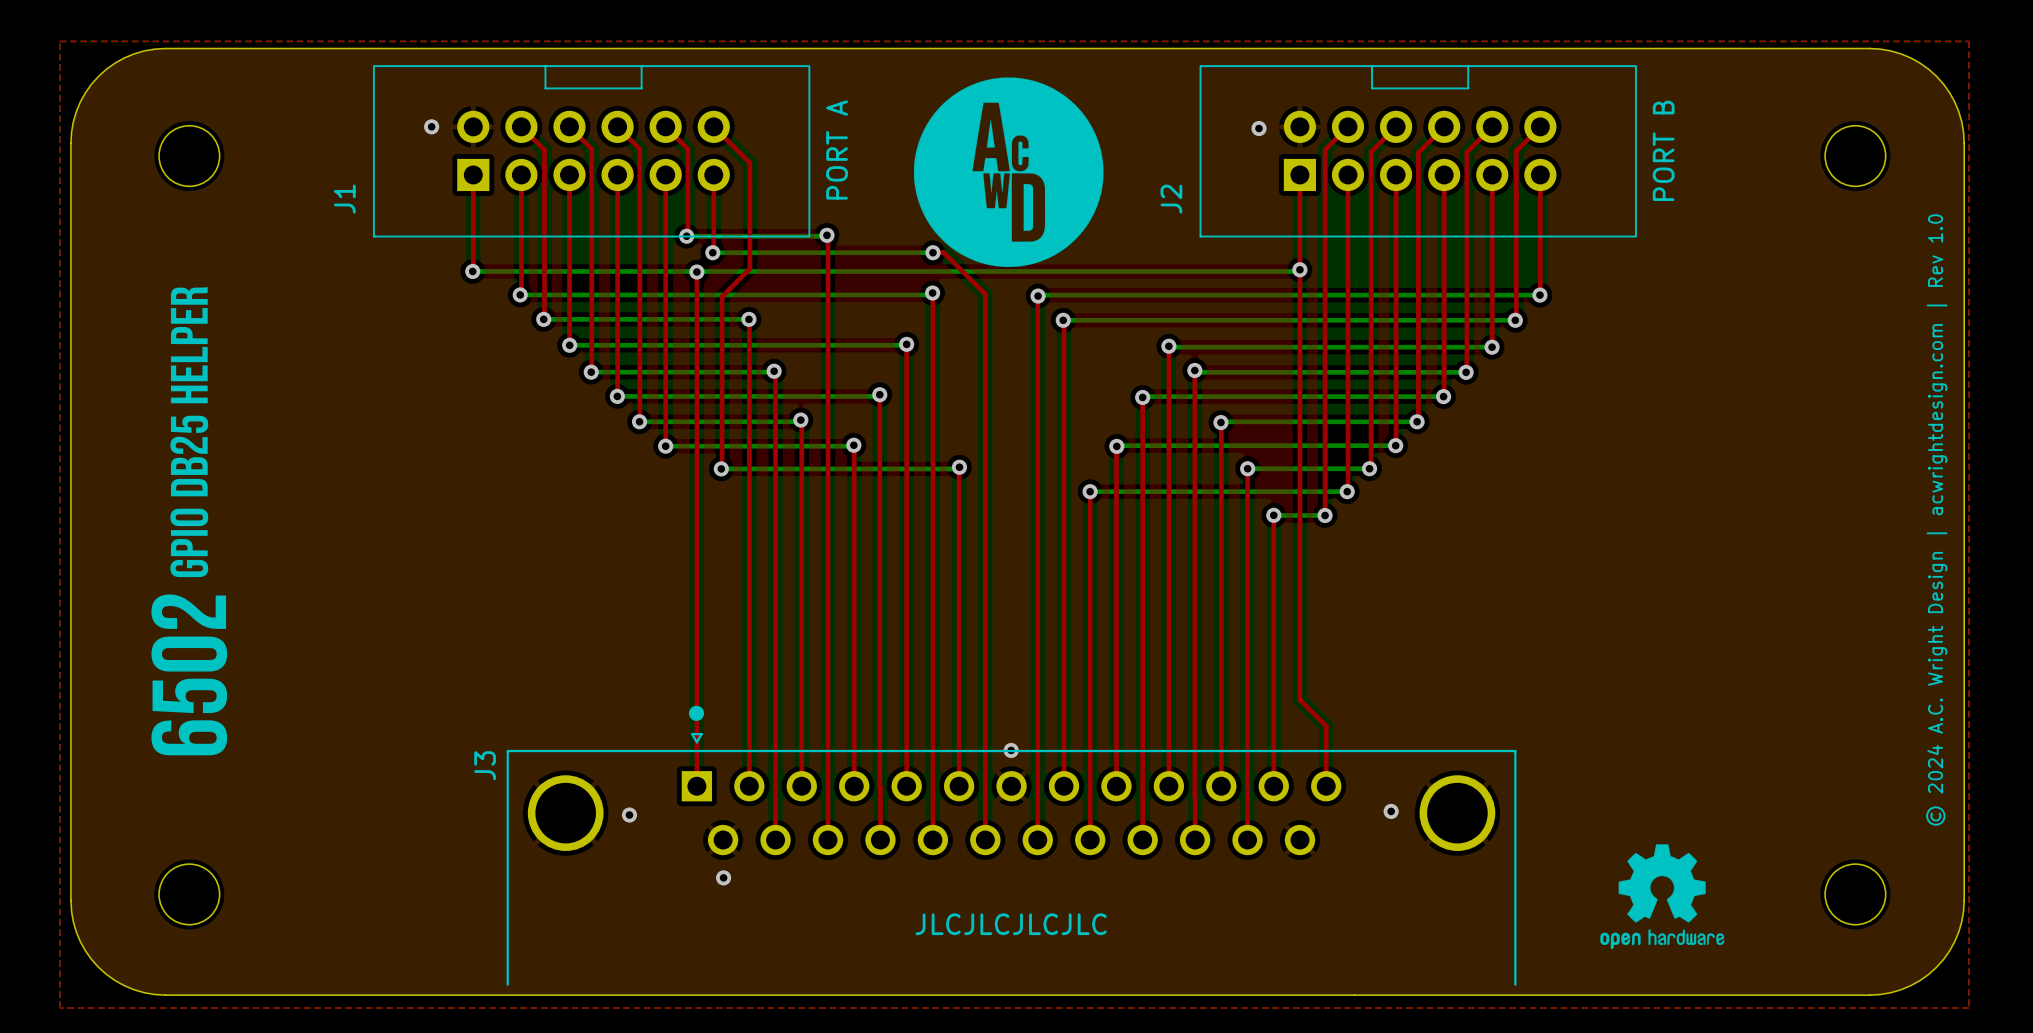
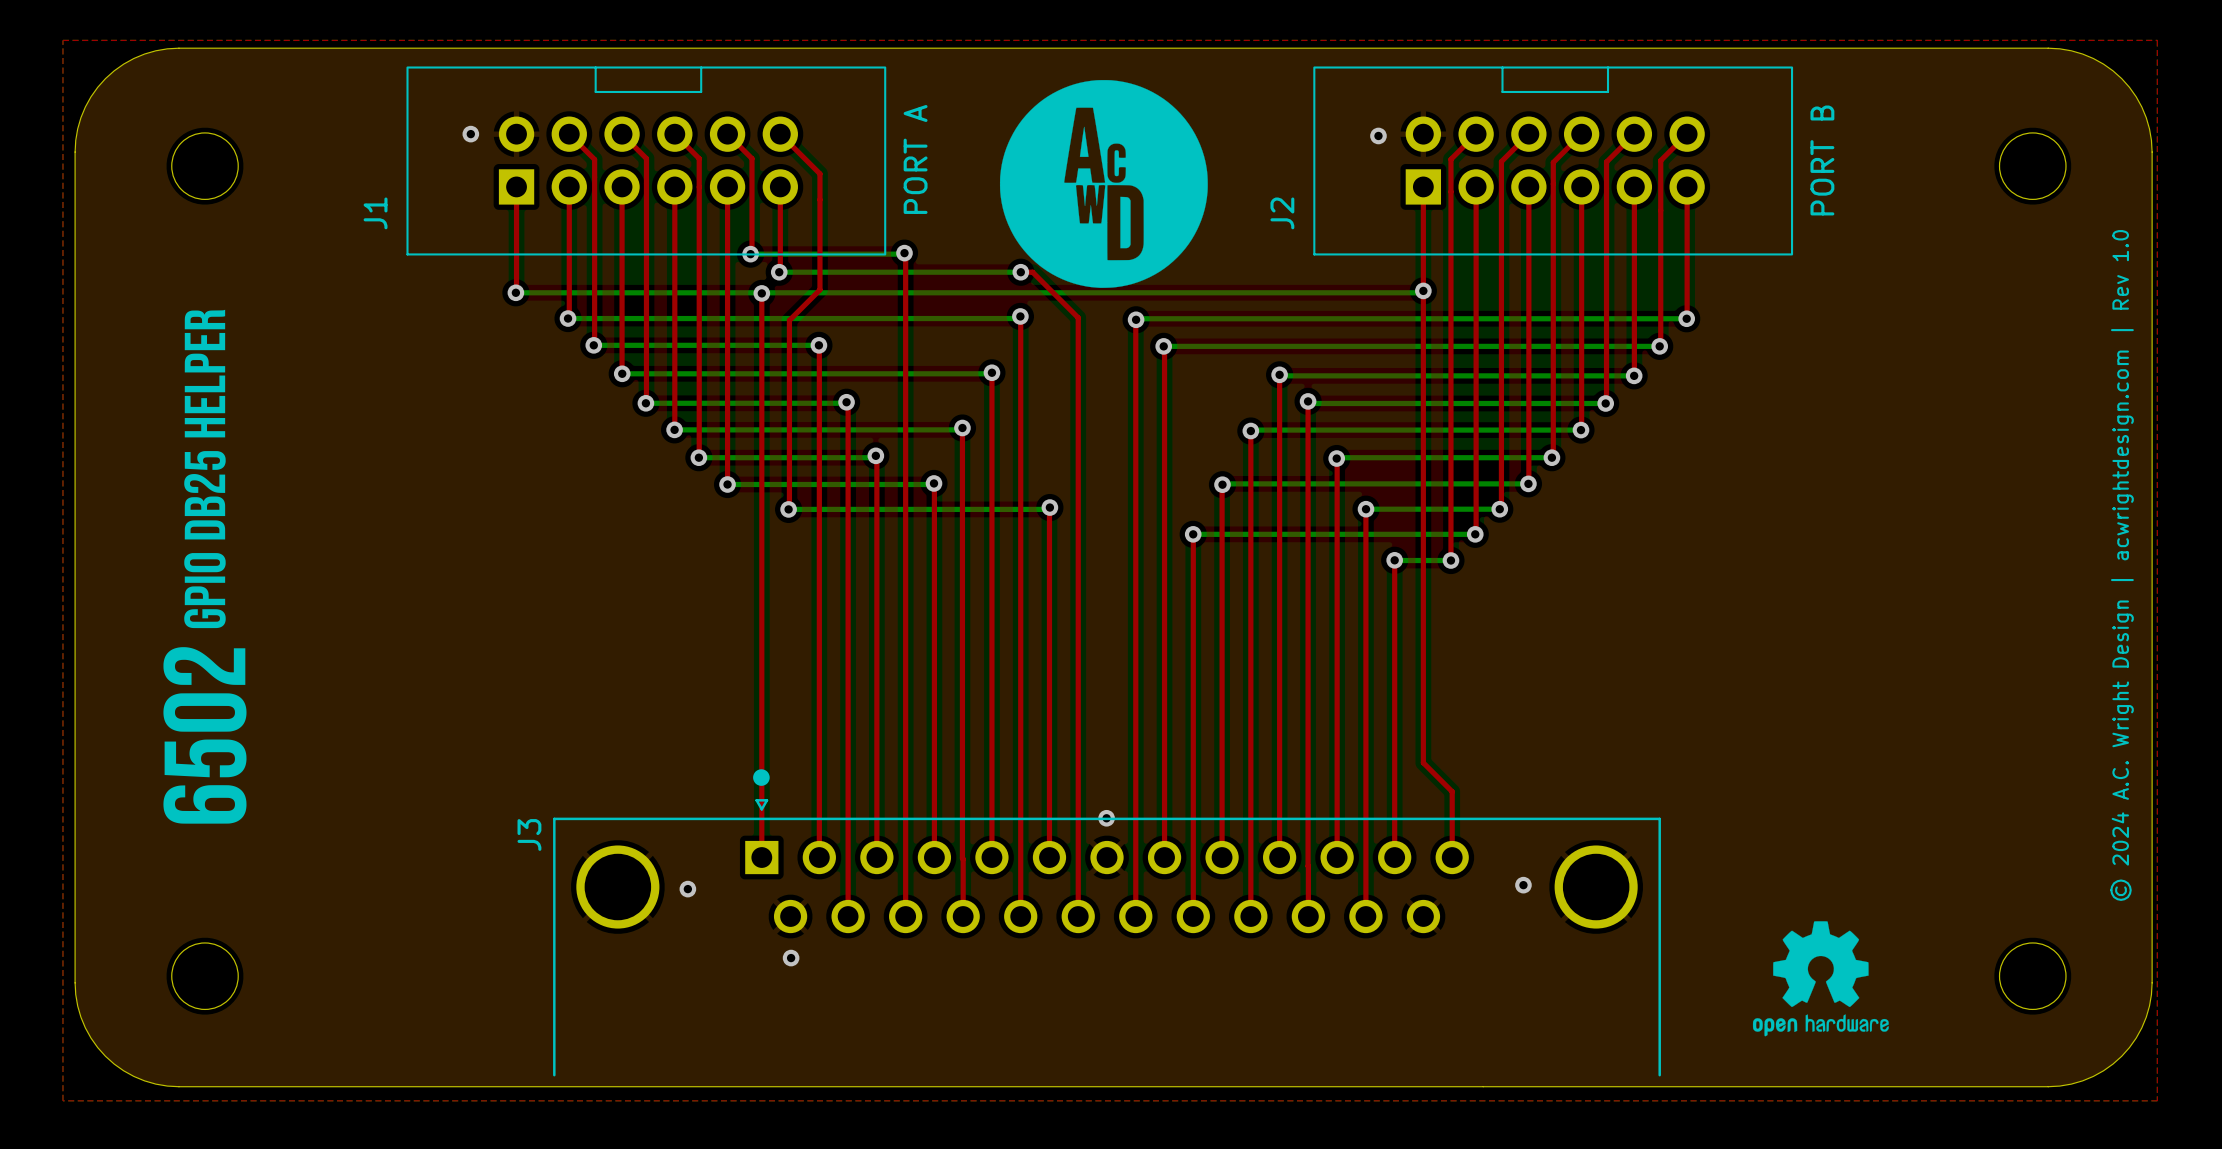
text: JLCJLCJLCJLC (1011, 924) -> none

